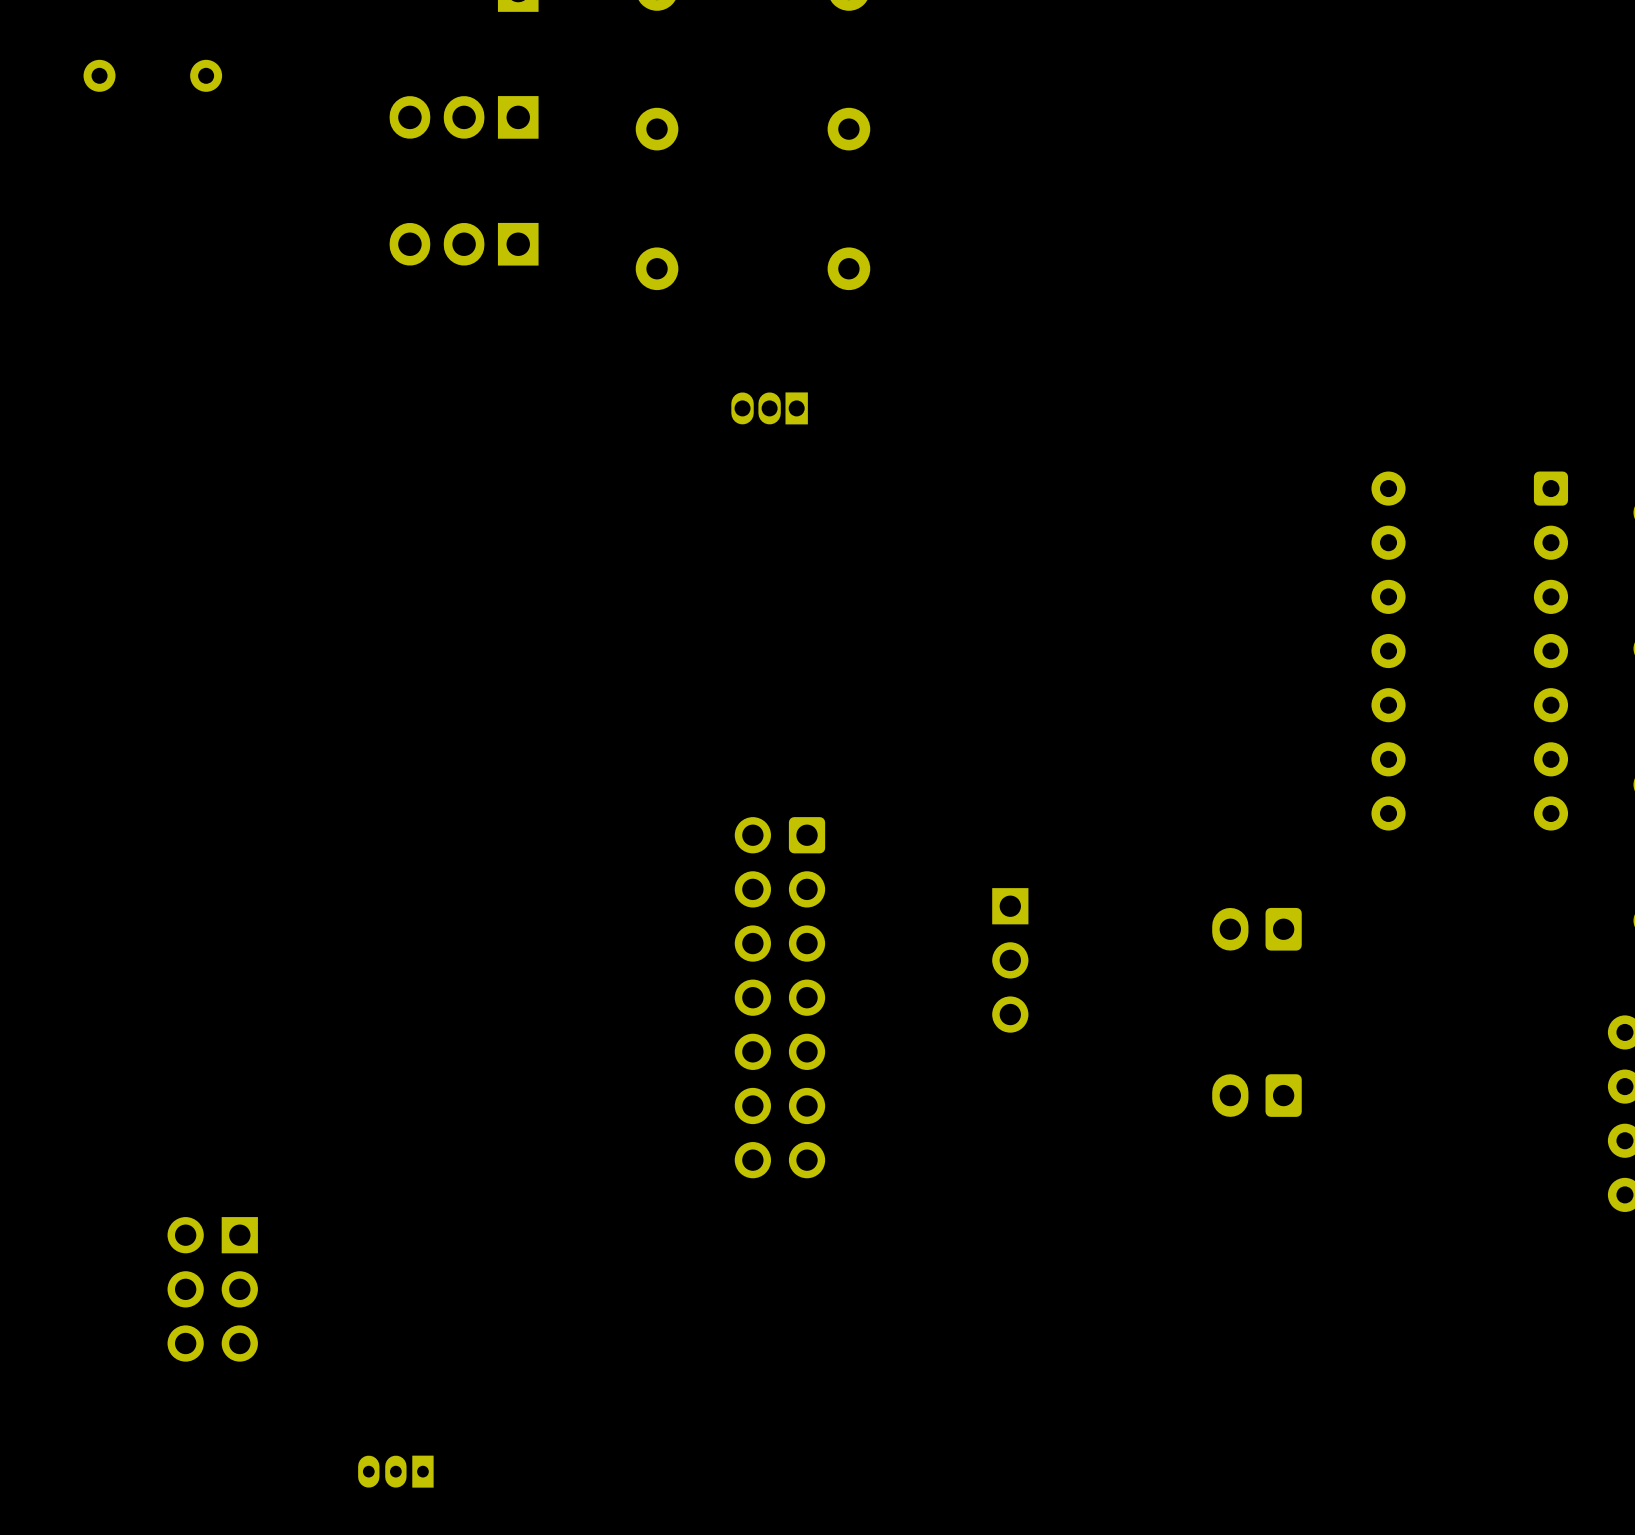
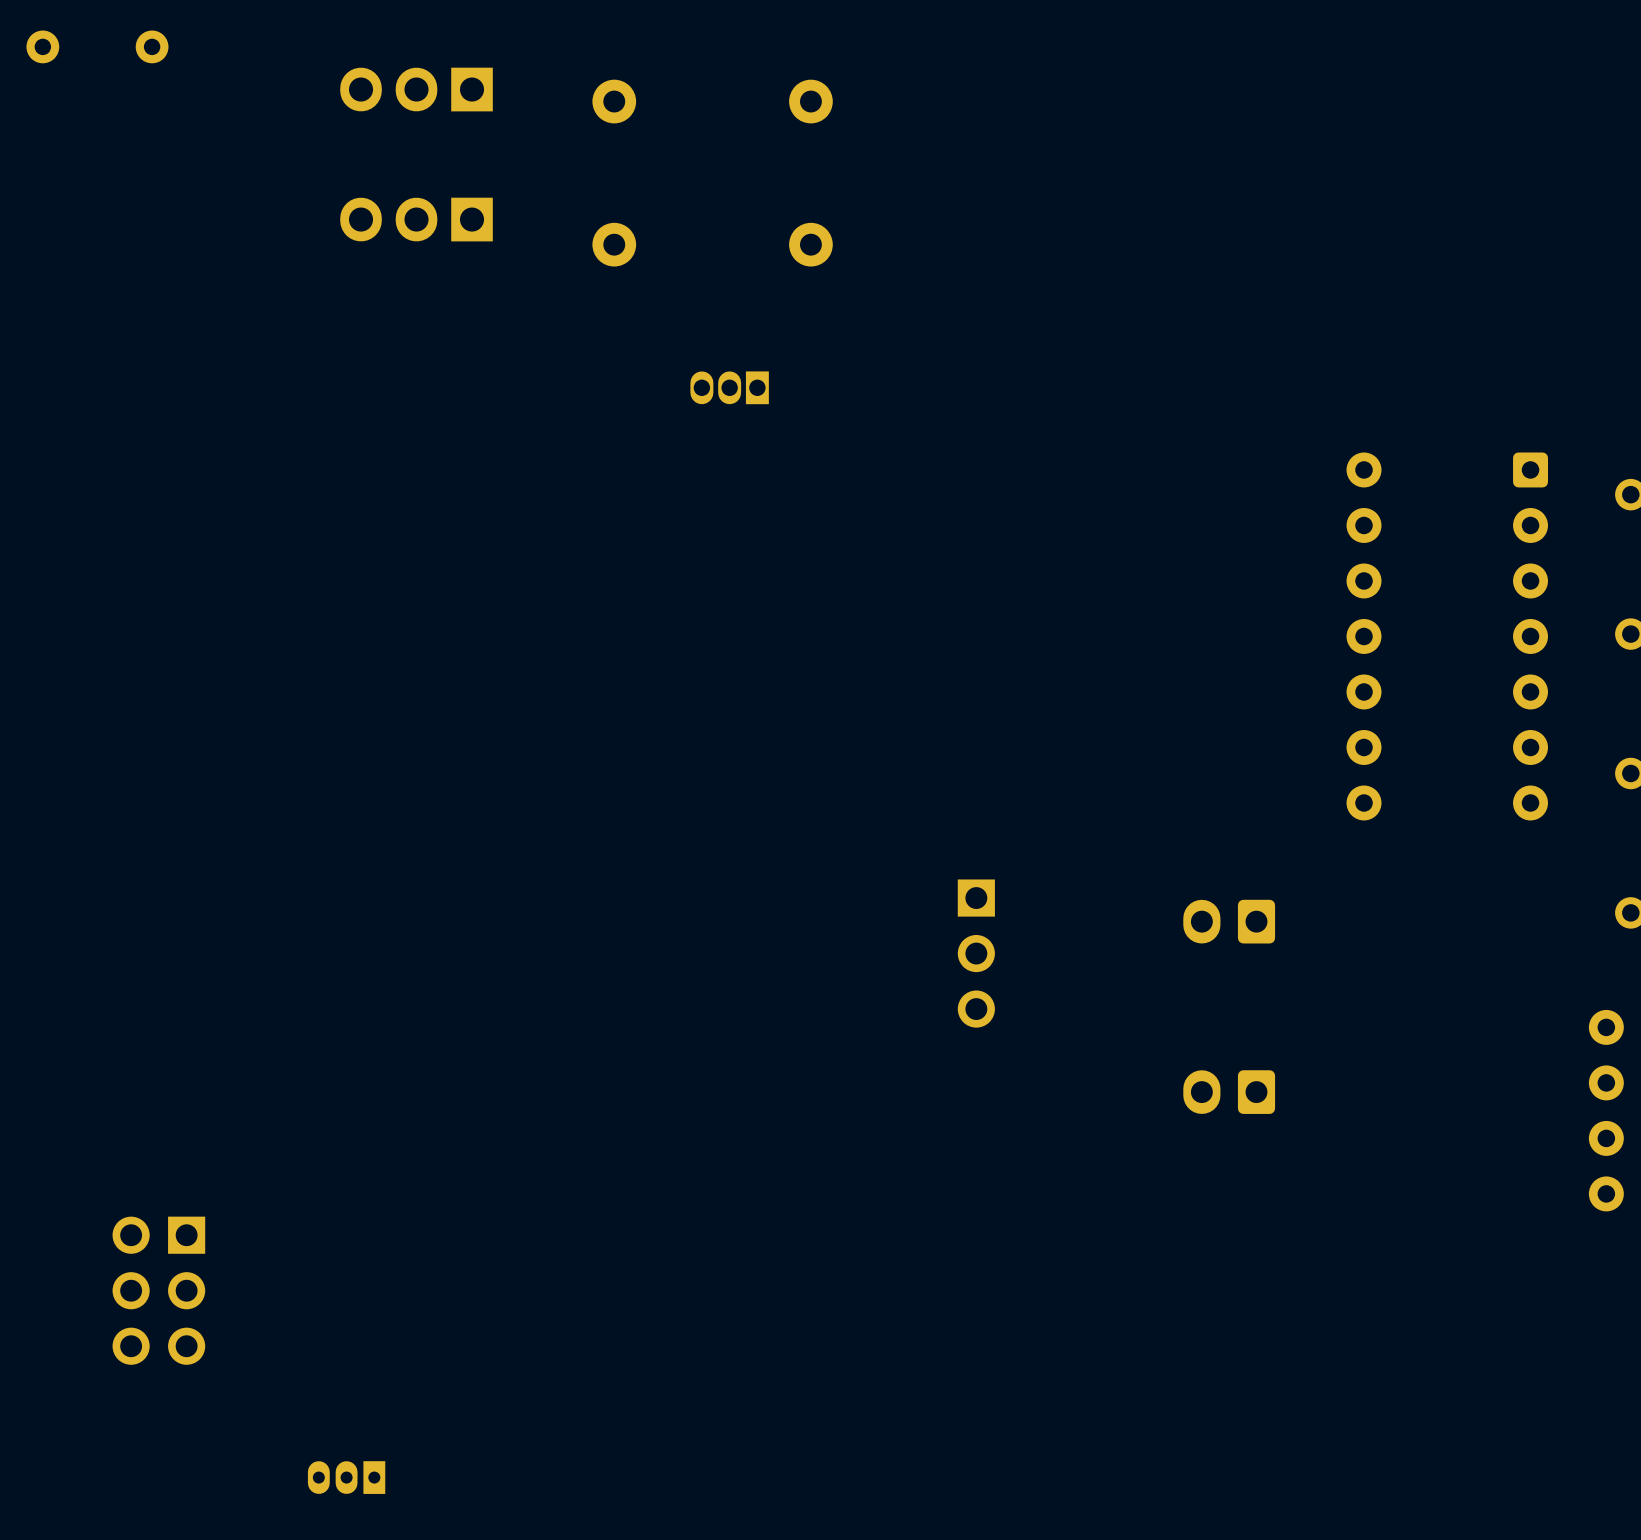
part: (779, 997) -> none

